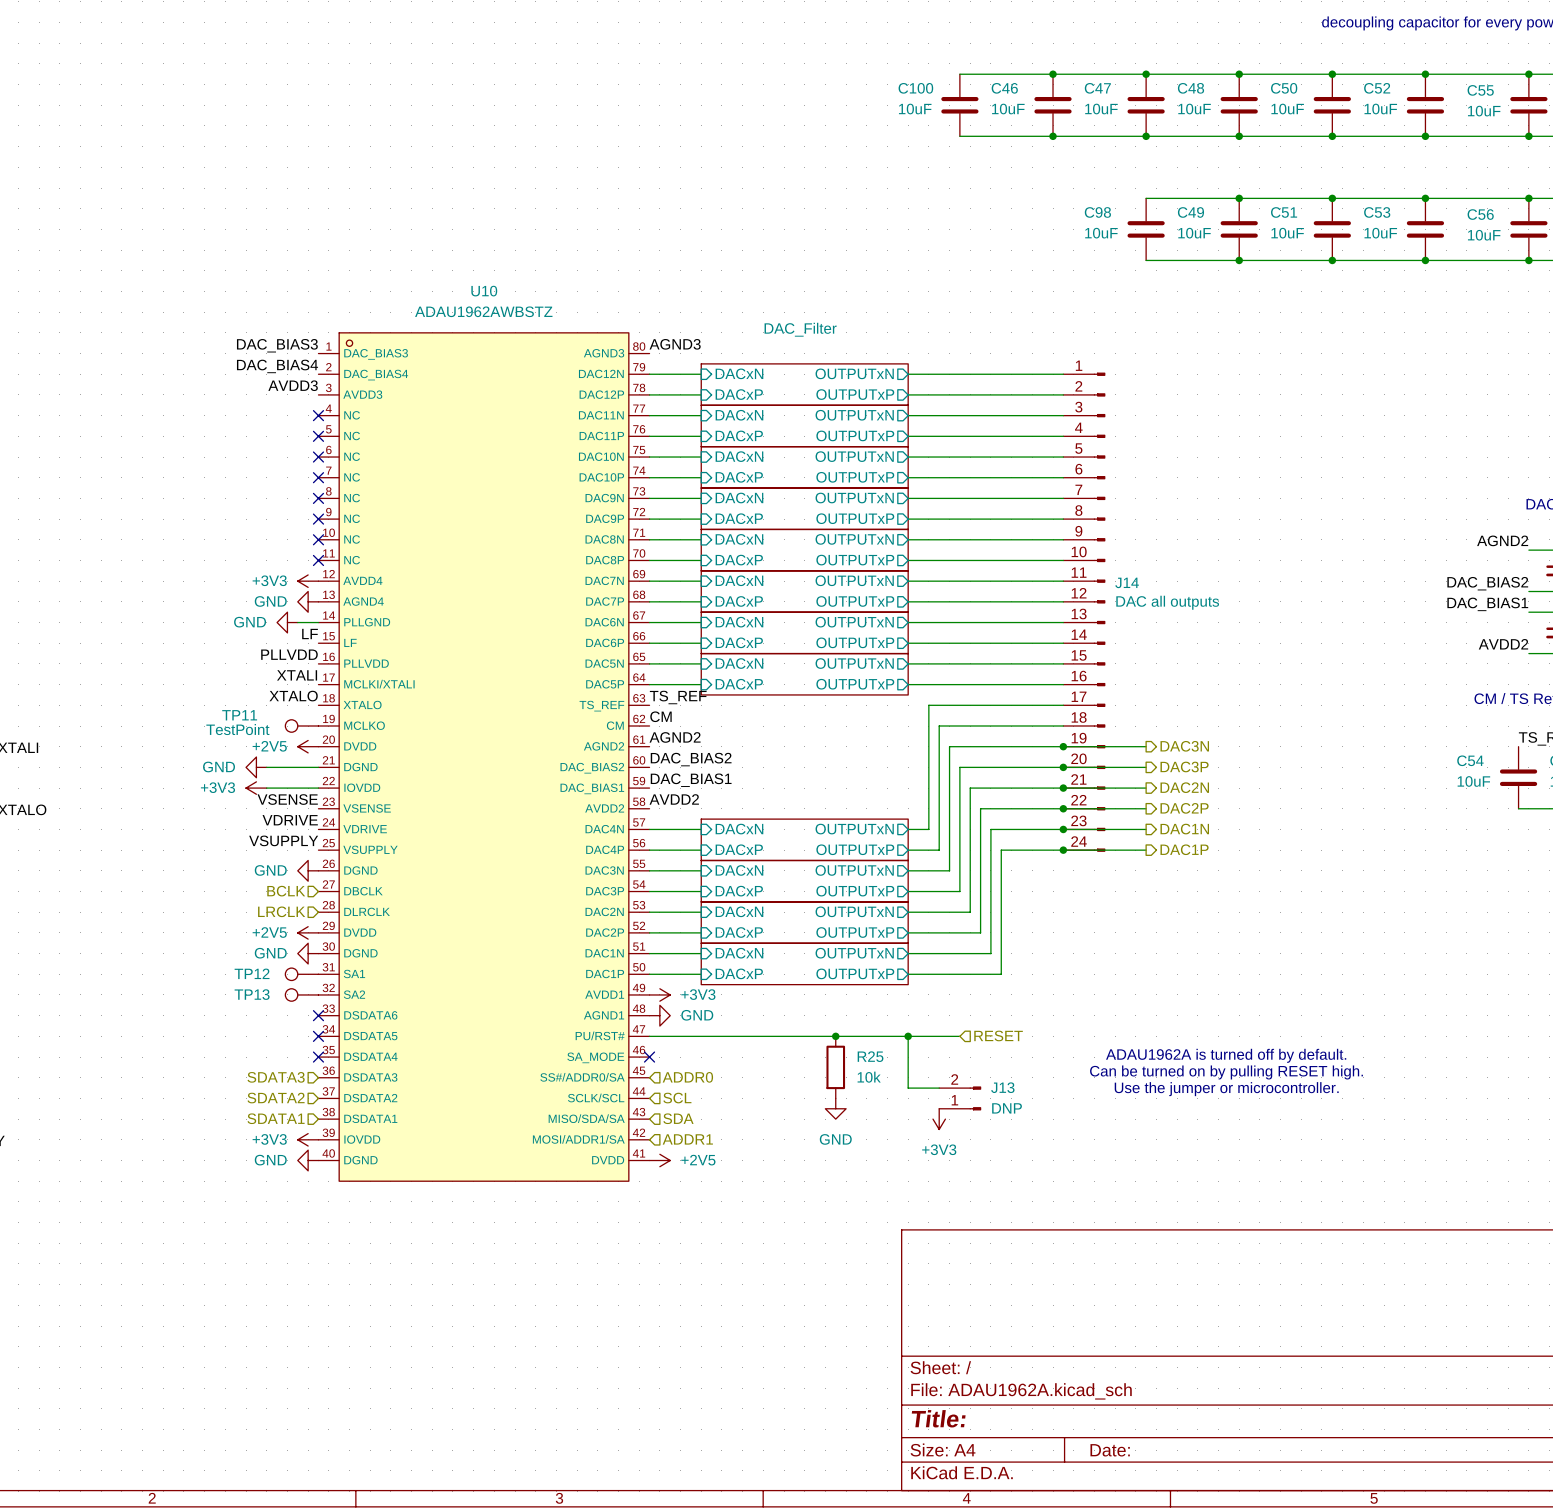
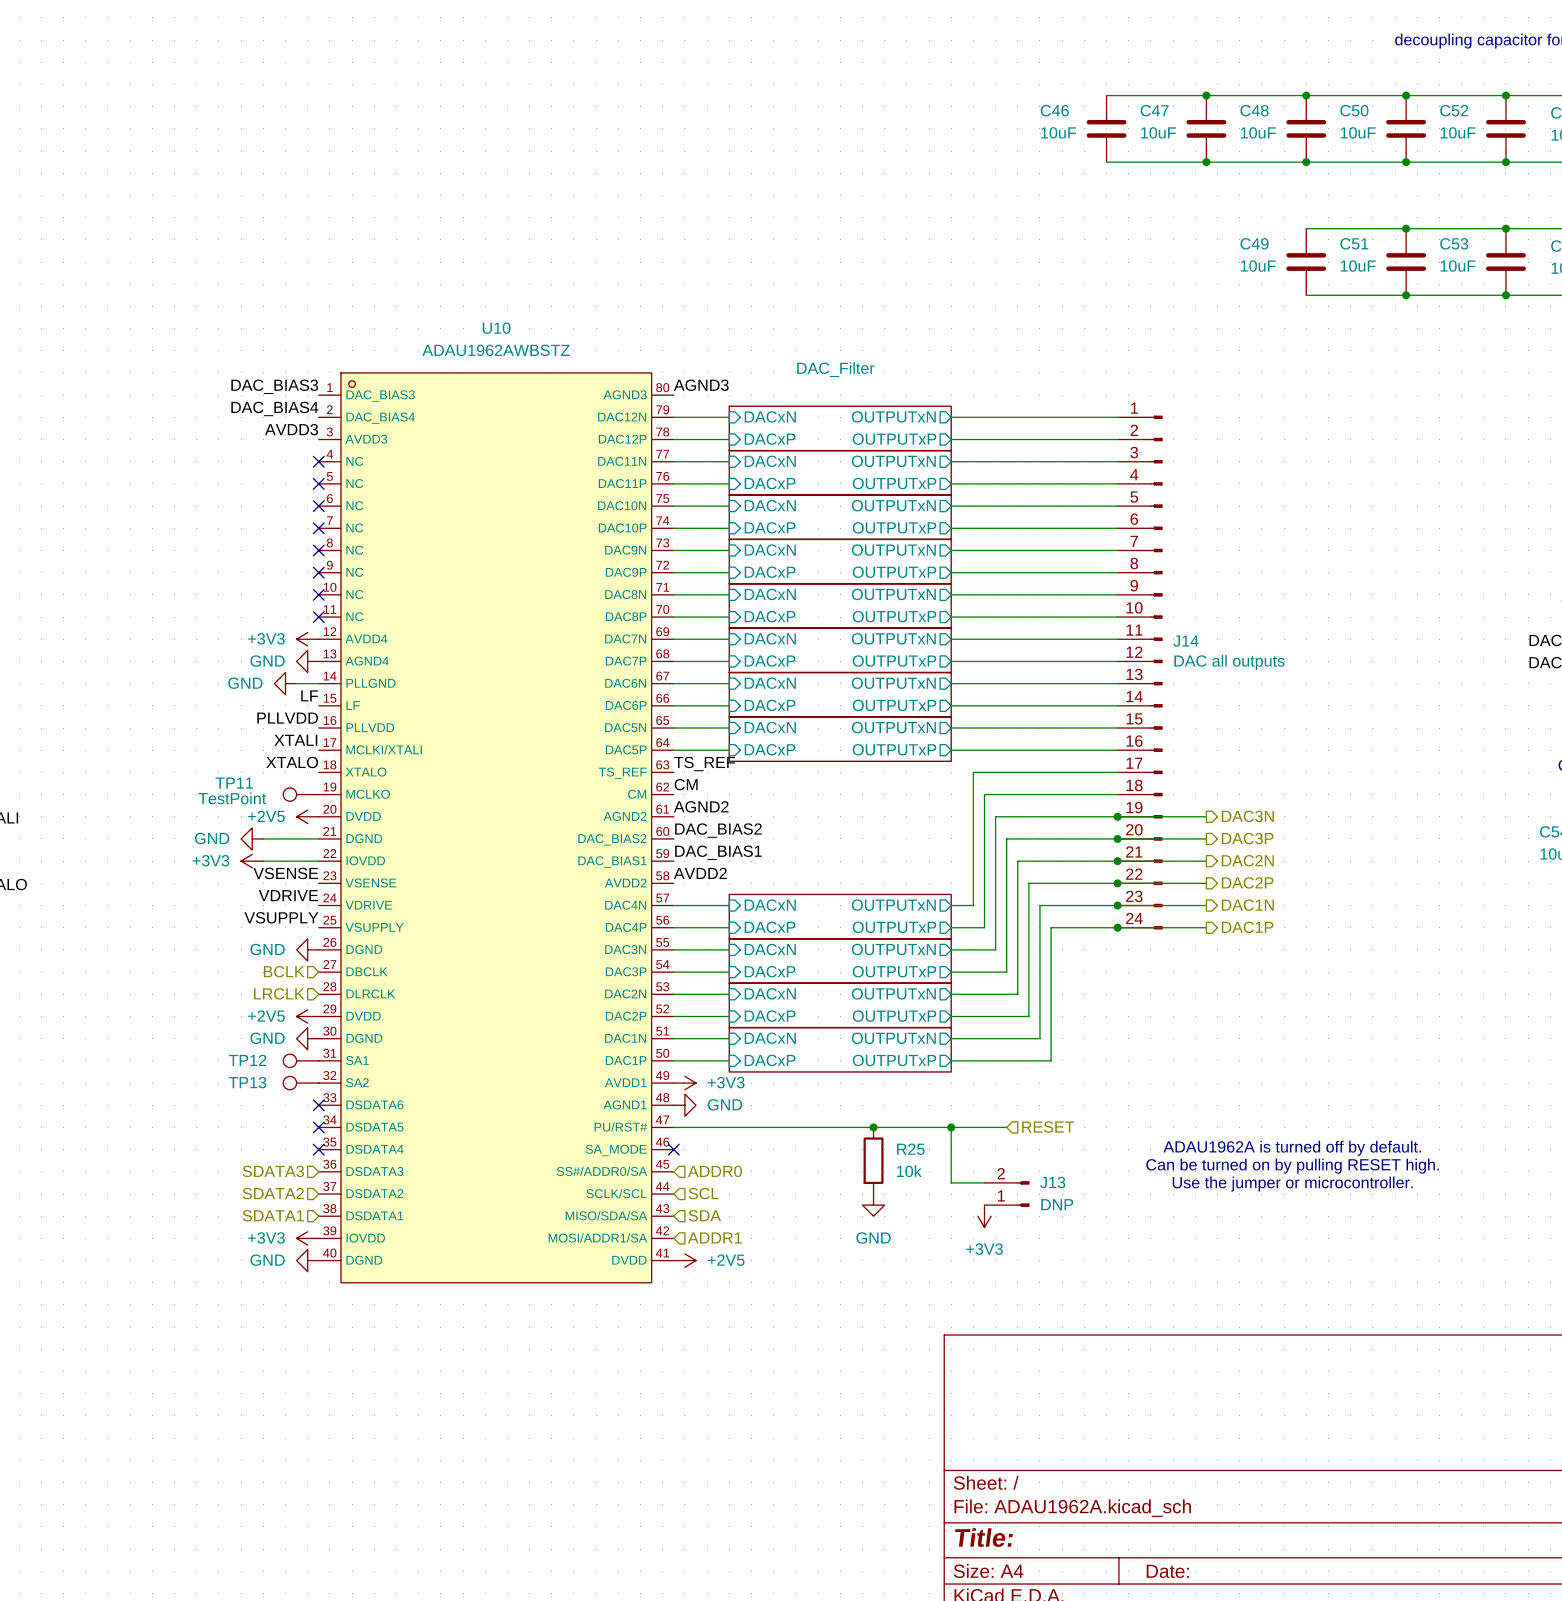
wire: (959, 74) (1053, 74) -> none
junction: (1053, 74) -> none
C100: 10uF (959, 105) -> none
wire: (959, 136) (1053, 136) -> none
junction: (1053, 136) -> none
wire: (1146, 198) (1239, 198) -> none
junction: (1239, 198) -> none
C98: 10uF (1146, 229) -> none
wire: (1146, 260) (1239, 260) -> none
junction: (1239, 260) -> none

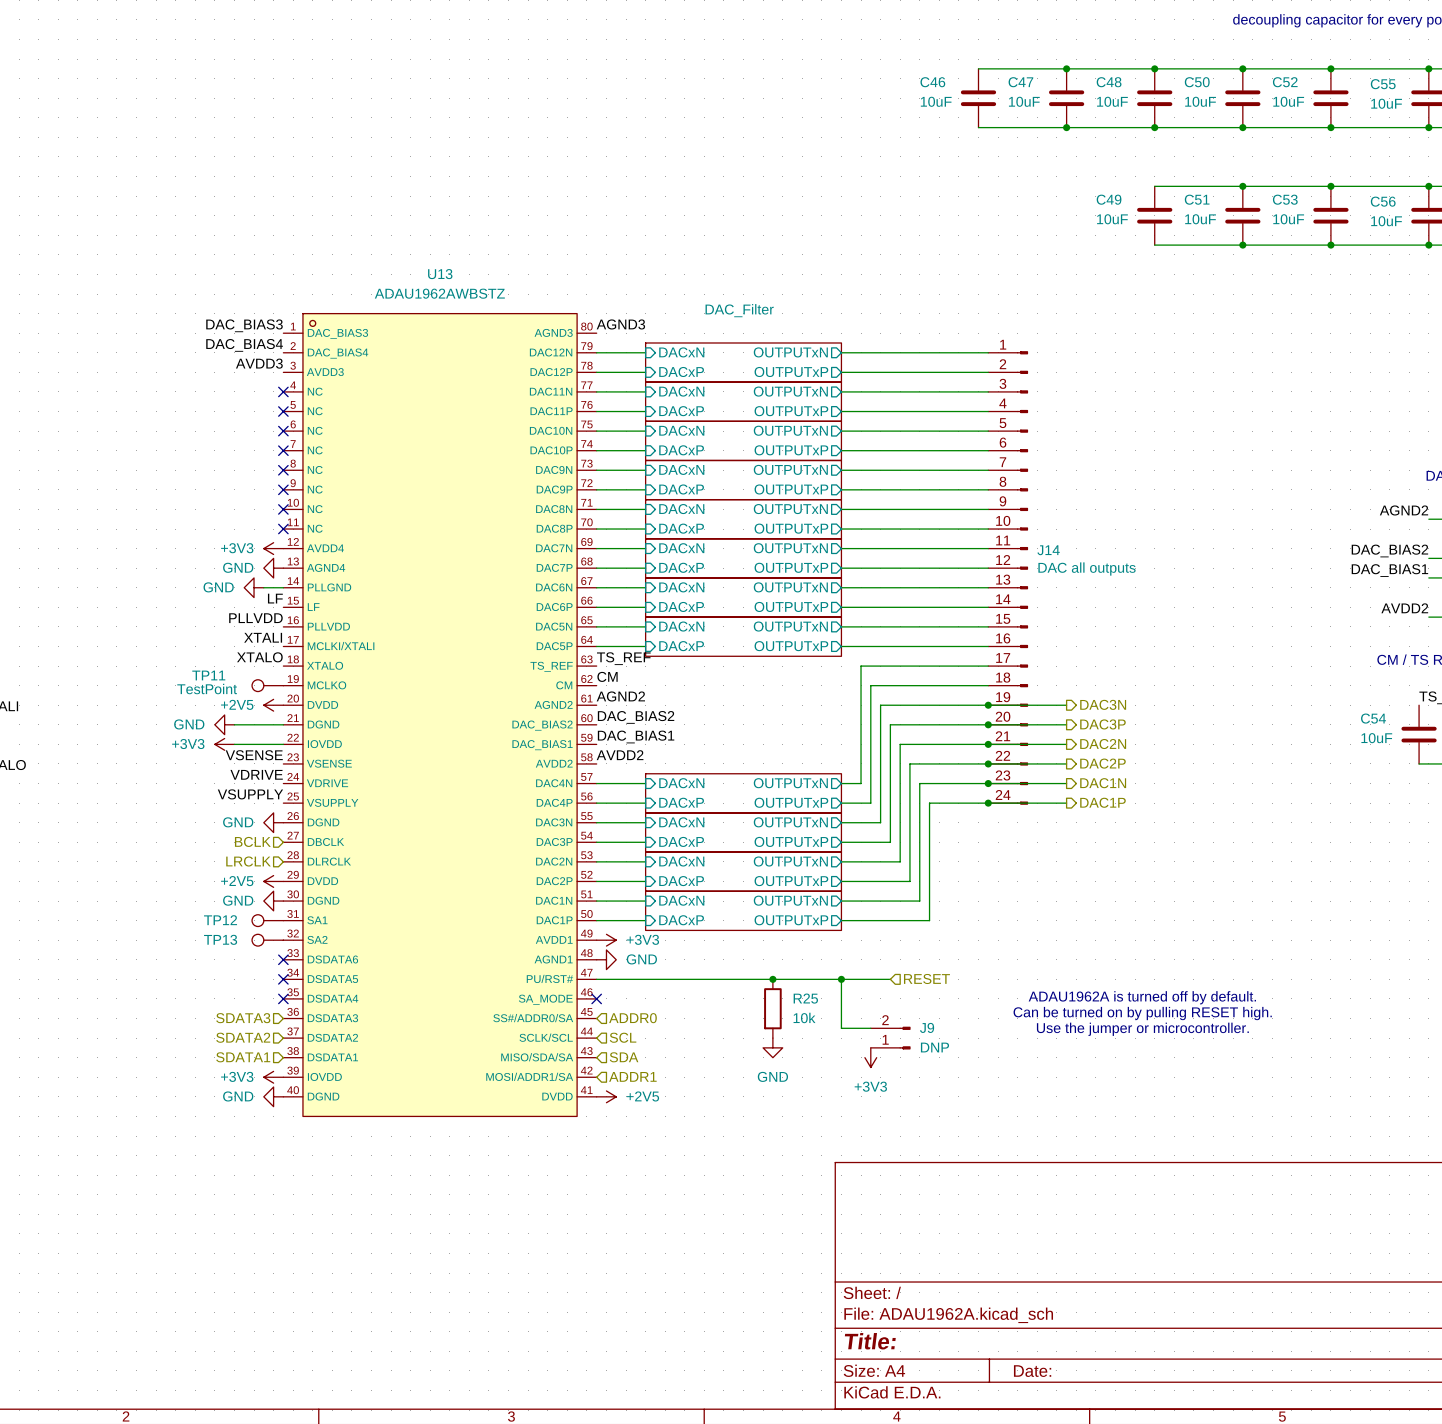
U10 name: U10 (496, 328) -> U13 (440, 274)
J13 name: J13 (1052, 1182) -> J9 (927, 1027)

